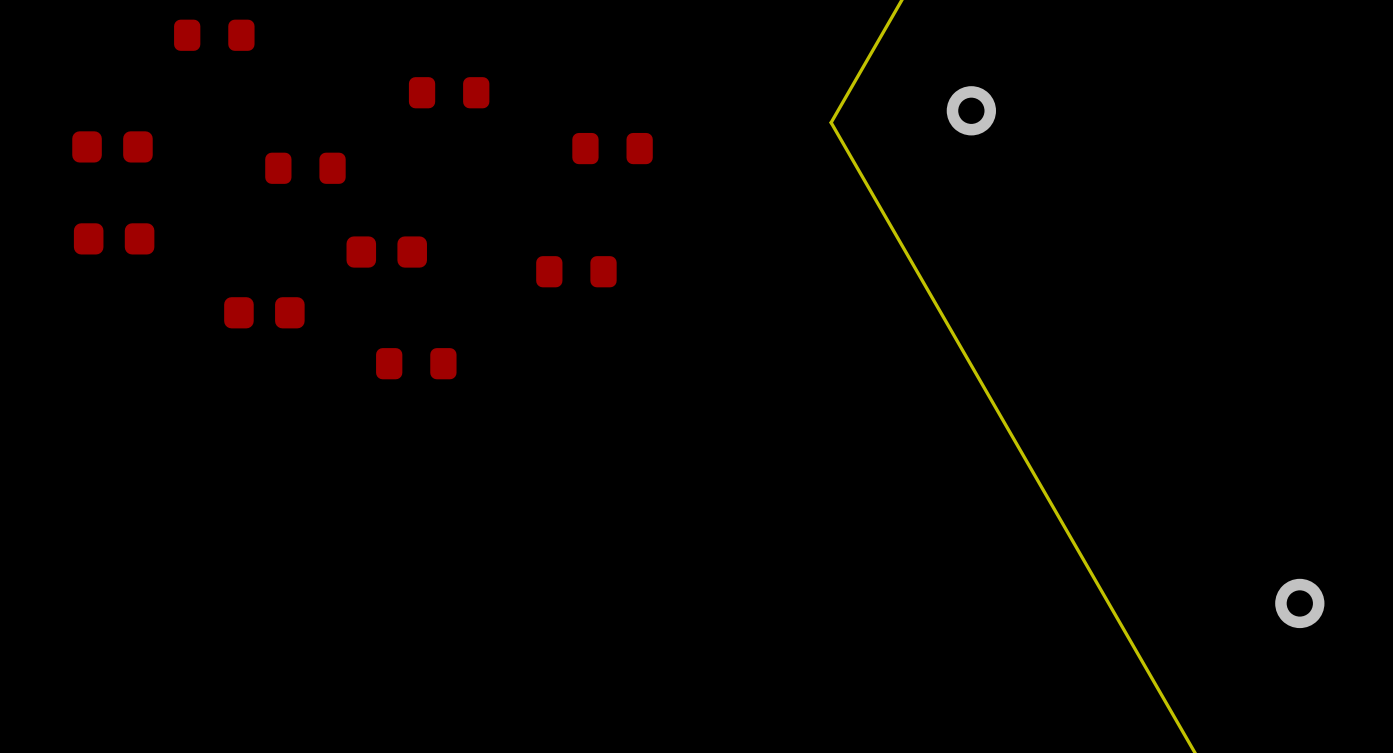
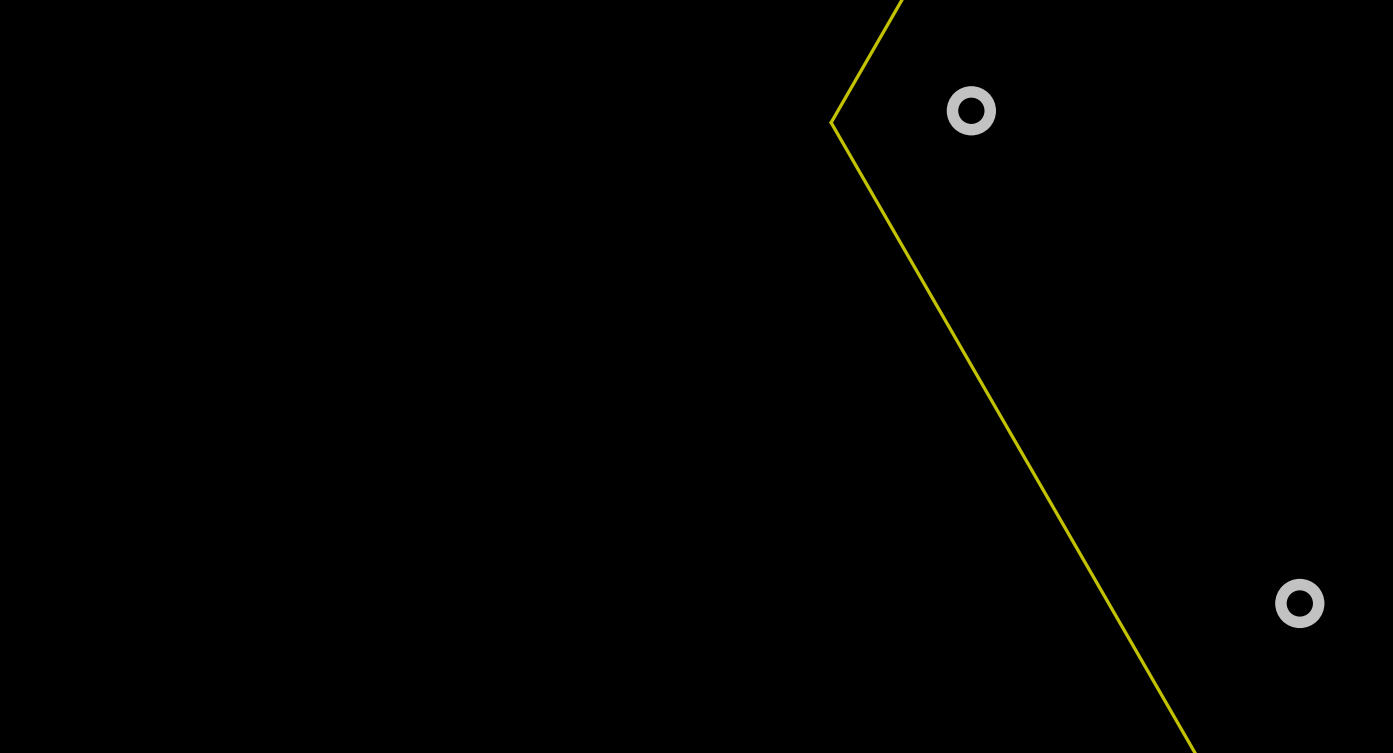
part: (214, 35) -> none
part: (449, 92) -> none
part: (112, 146) -> none
part: (612, 148) -> none
part: (305, 168) -> none
part: (114, 238) -> none
part: (386, 252) -> none
part: (576, 271) -> none
part: (264, 312) -> none
part: (416, 363) -> none

